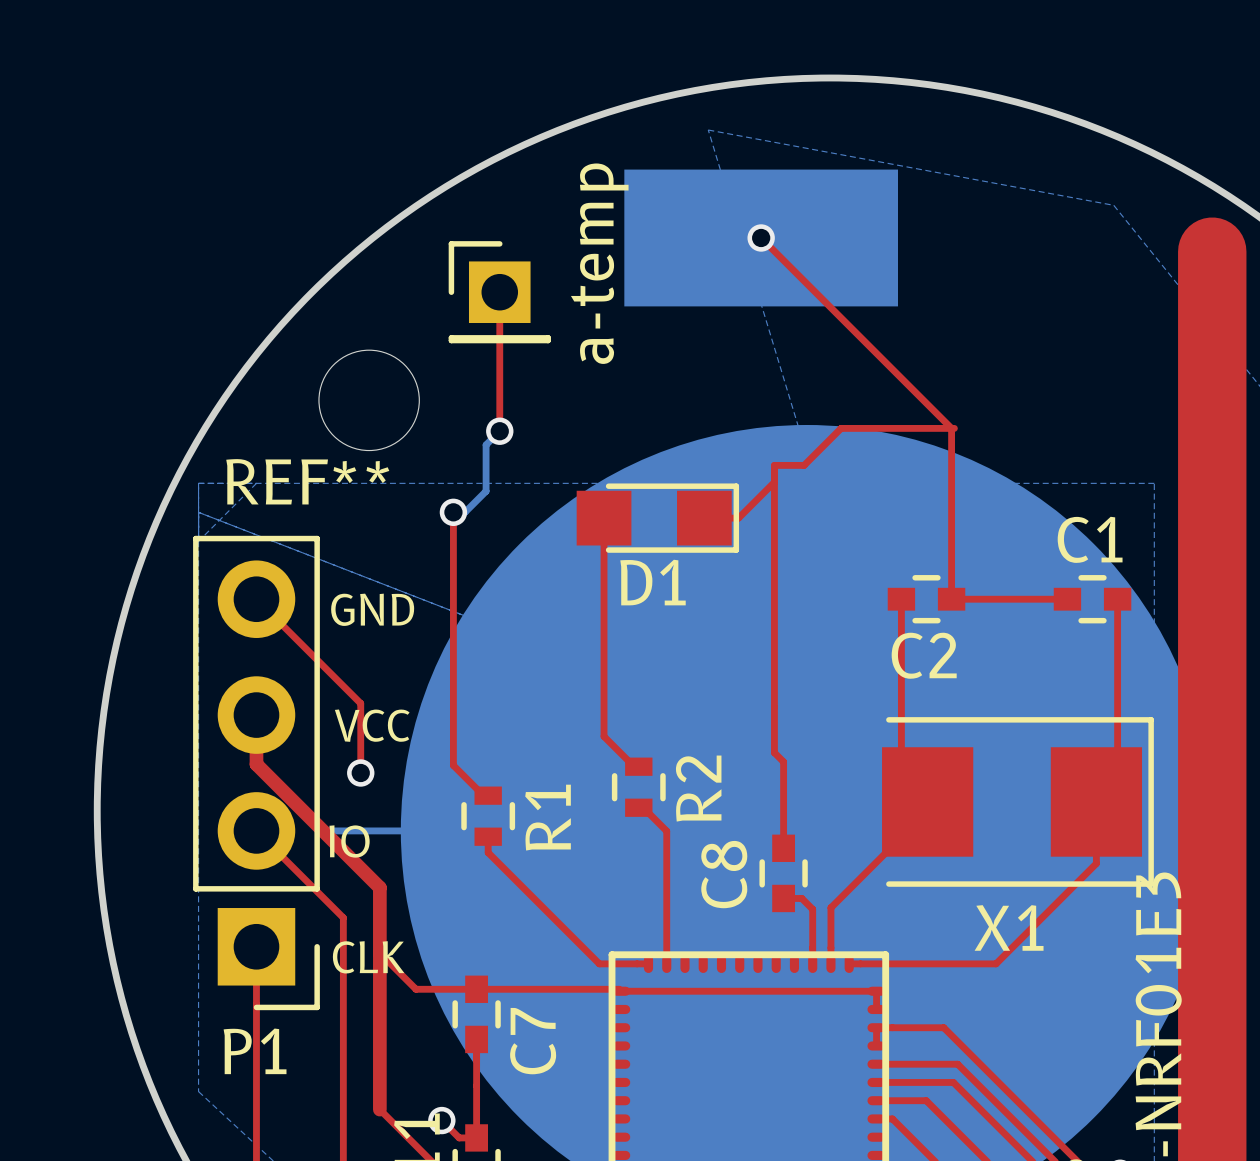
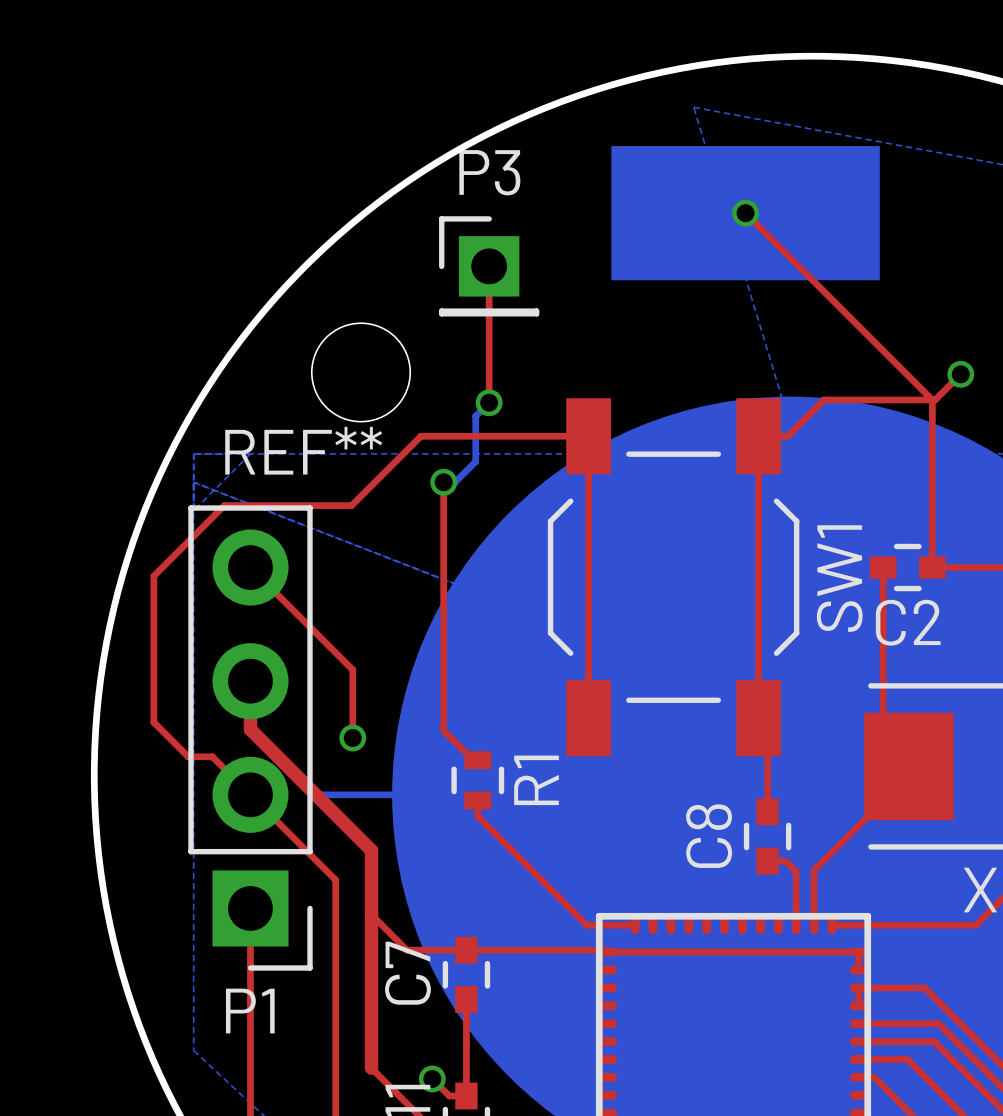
a-temp name: a-temp (599, 263) -> P3 (489, 172)
top track: none -> (960, 374) (935, 399)
via: none -> (960, 374)
top track: (774, 482) (738, 518) (704, 518) -> none
top track: (604, 518) (604, 736) (634, 766) (638, 766) -> none
D1: (657, 518) -> none
text: GND (372, 609) -> none
SW1: none -> (673, 577)
text: VCC (372, 725) -> none
top track: none -> (588, 718) (588, 436) (420, 436) (351, 505) (224, 505) (153, 576) (153, 722) (188, 756) (212, 756) (250, 794)
R2: (638, 787) -> none
top track: (638, 807) (643, 807) (666, 831) (666, 963) -> none
text: IO (349, 841) -> none
text: CLK (368, 957) -> none
C7 name position: C7 (533, 1041) -> C7 (407, 973)

